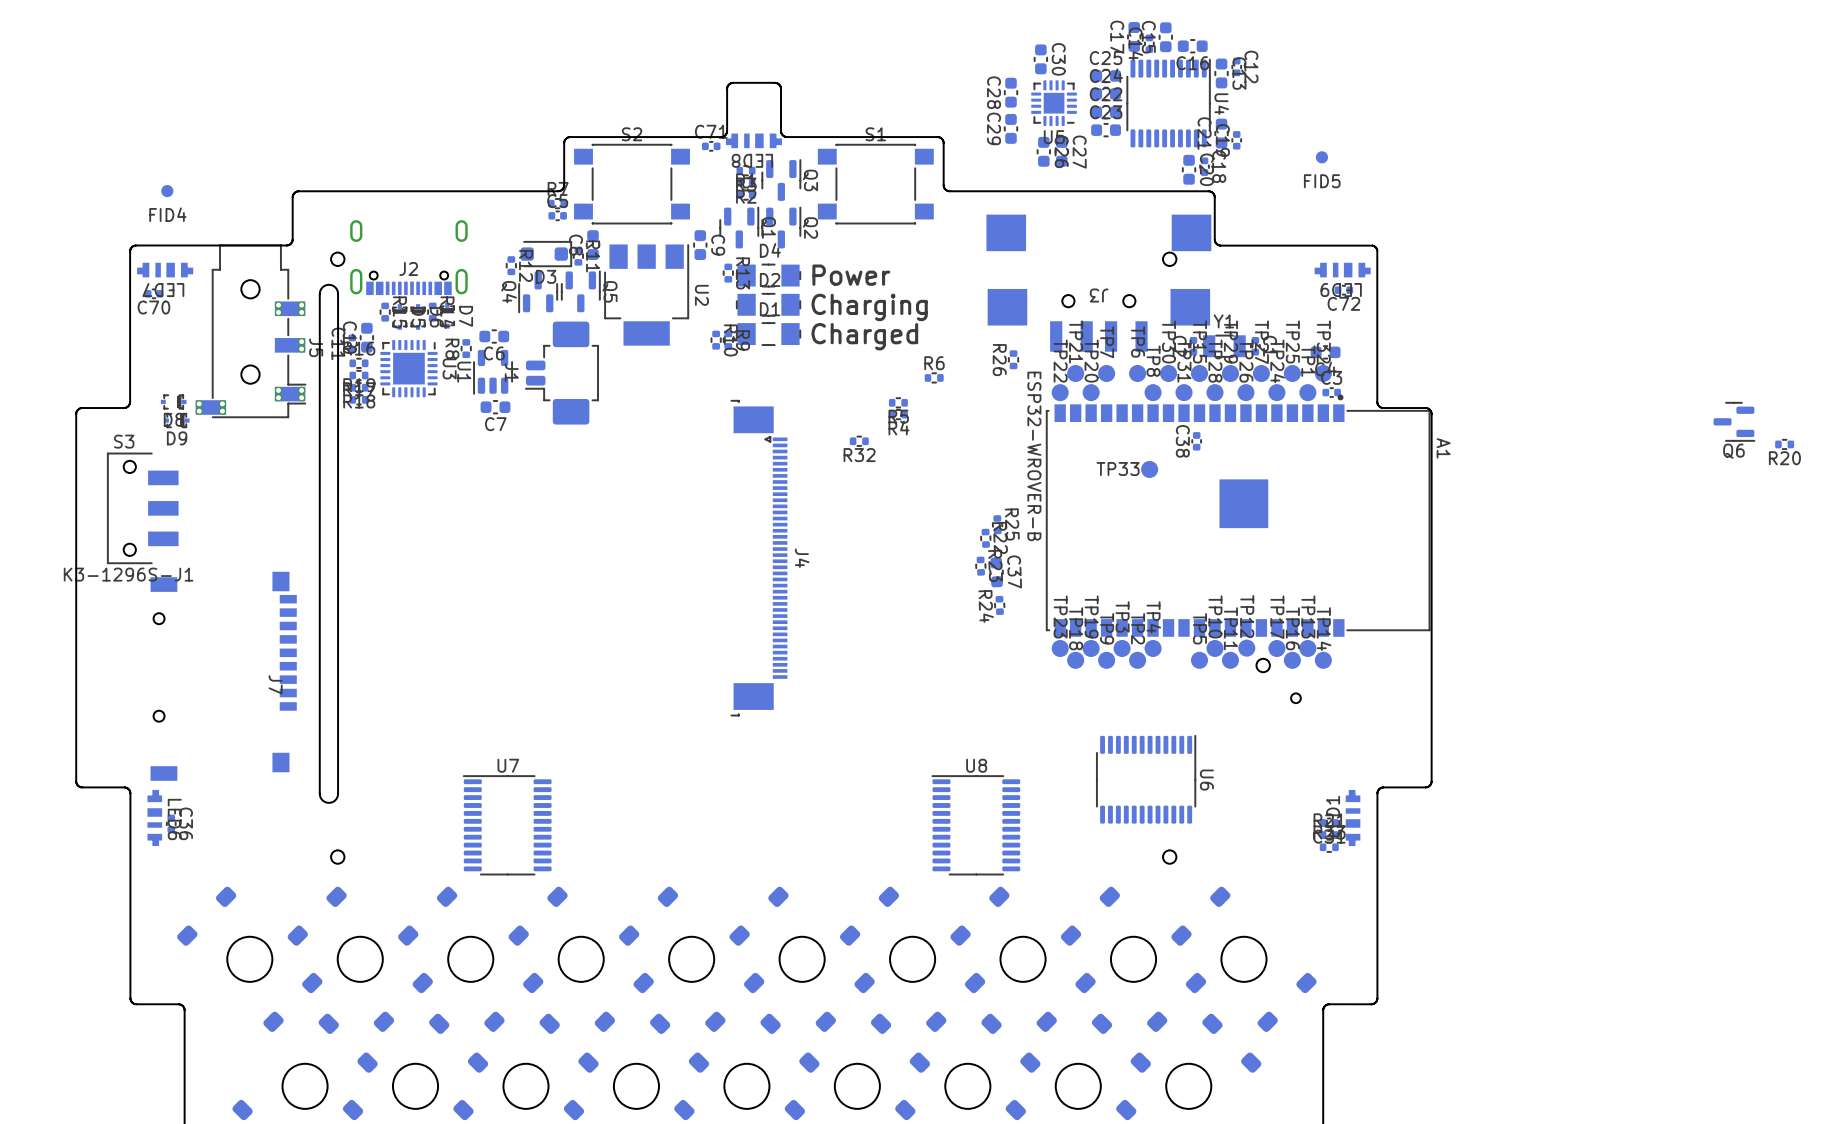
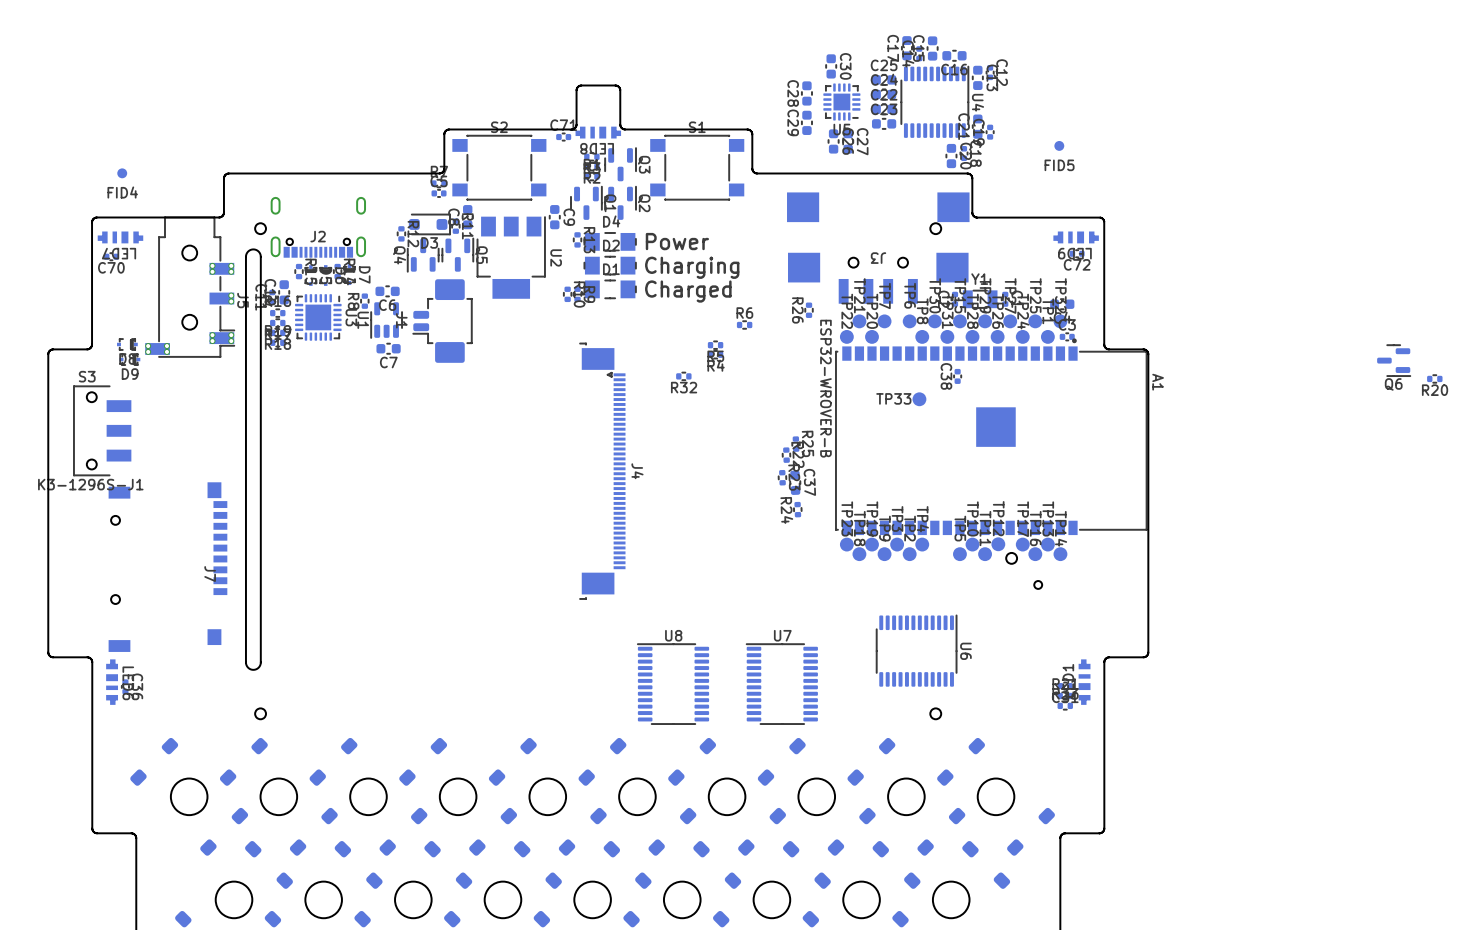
U7 position: (507, 825) -> (782, 684)
U8 position: (976, 825) -> (673, 684)

